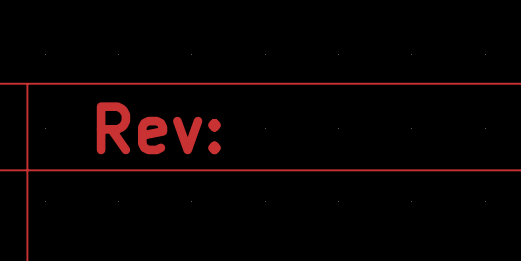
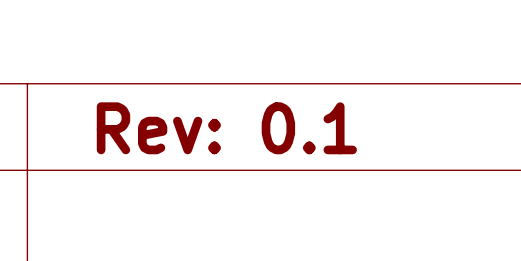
title block: Rev: (158, 128) -> Rev: 0.1 (226, 128)

